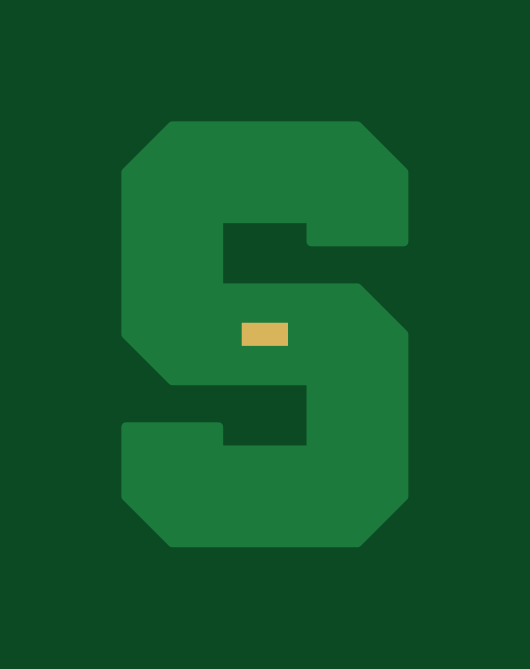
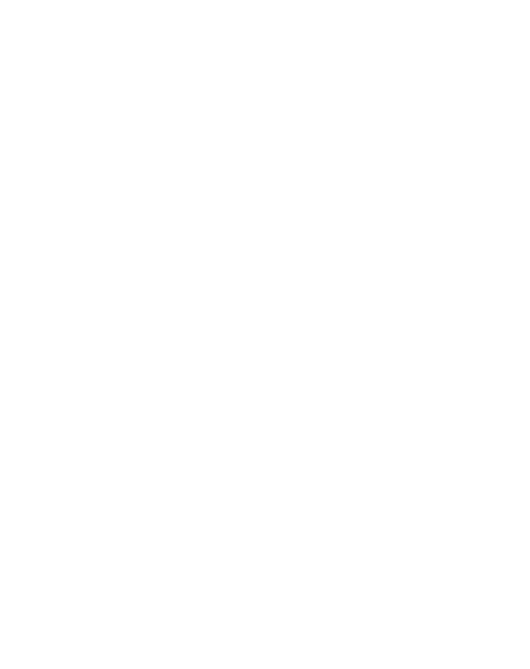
part: (264, 334) -> none

